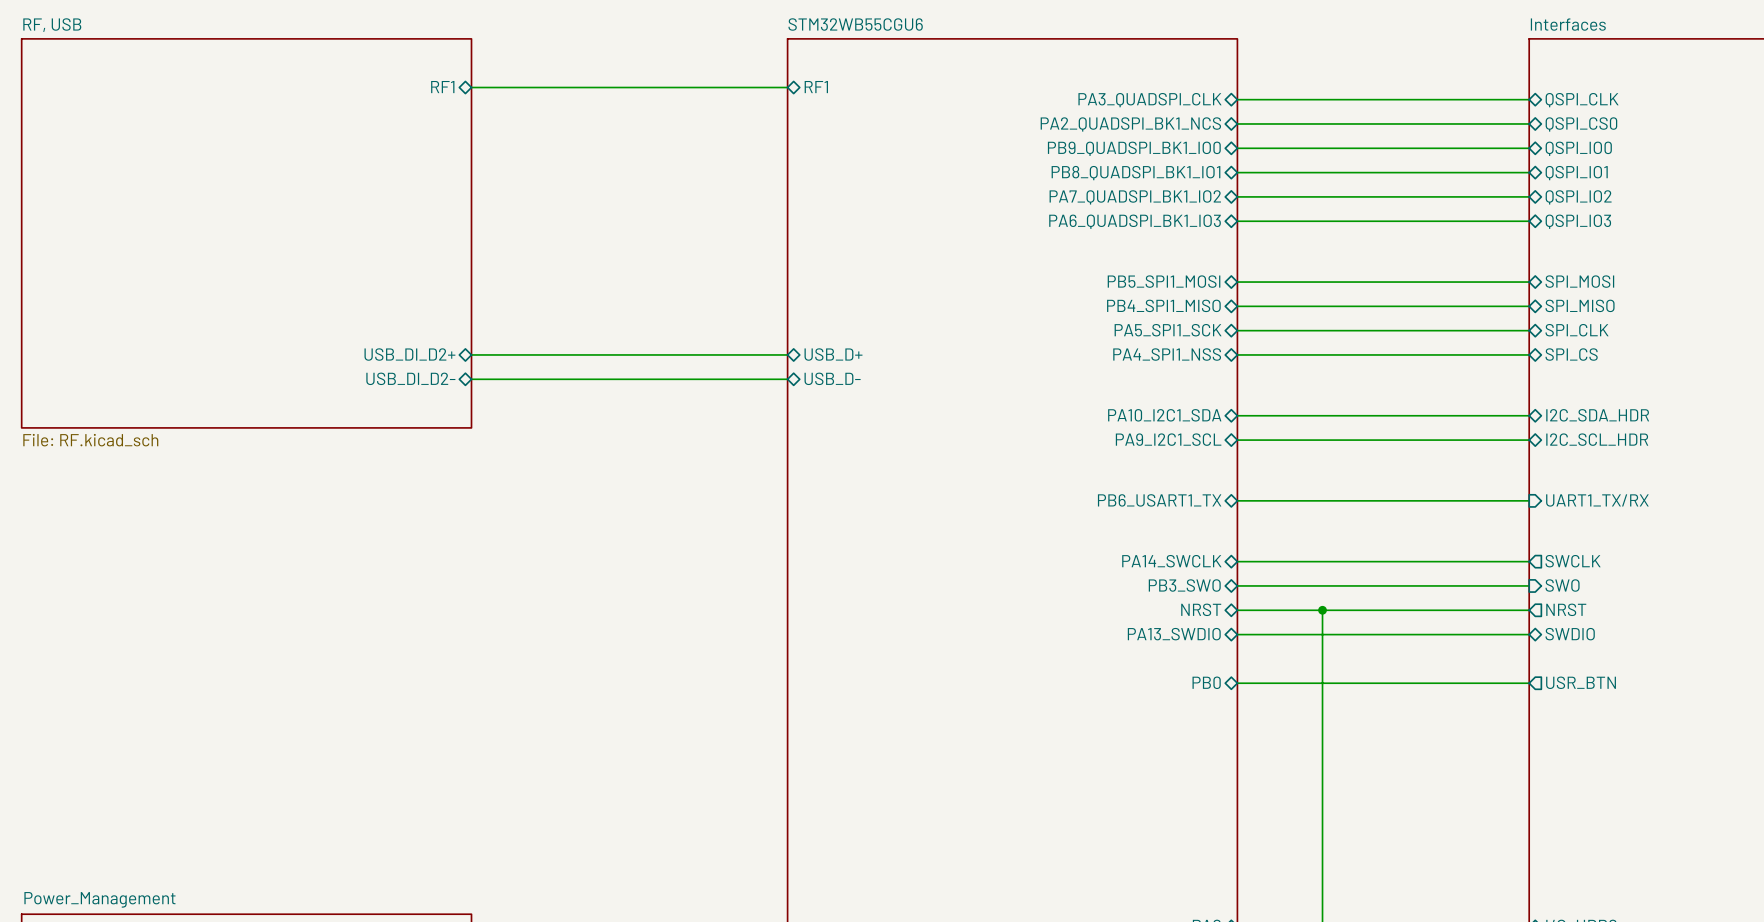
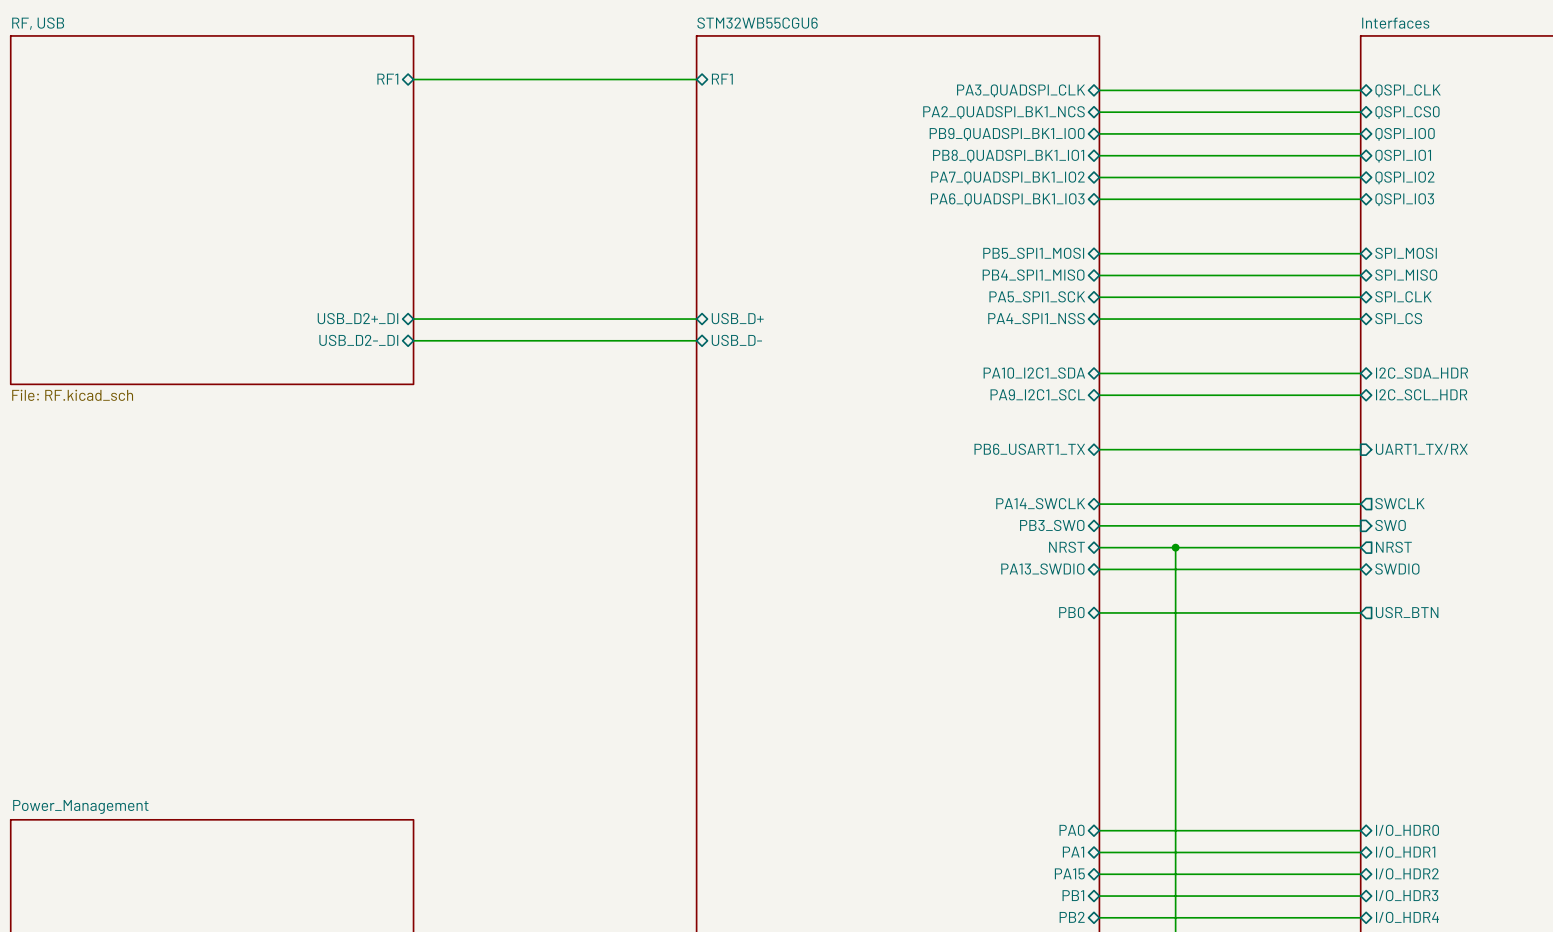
sheet pin: USB_DI_D2+ (409, 354) -> USB_D2+_DI (357, 318)
sheet pin: USB_DI_D2- (410, 378) -> USB_D2-_DI (358, 340)

